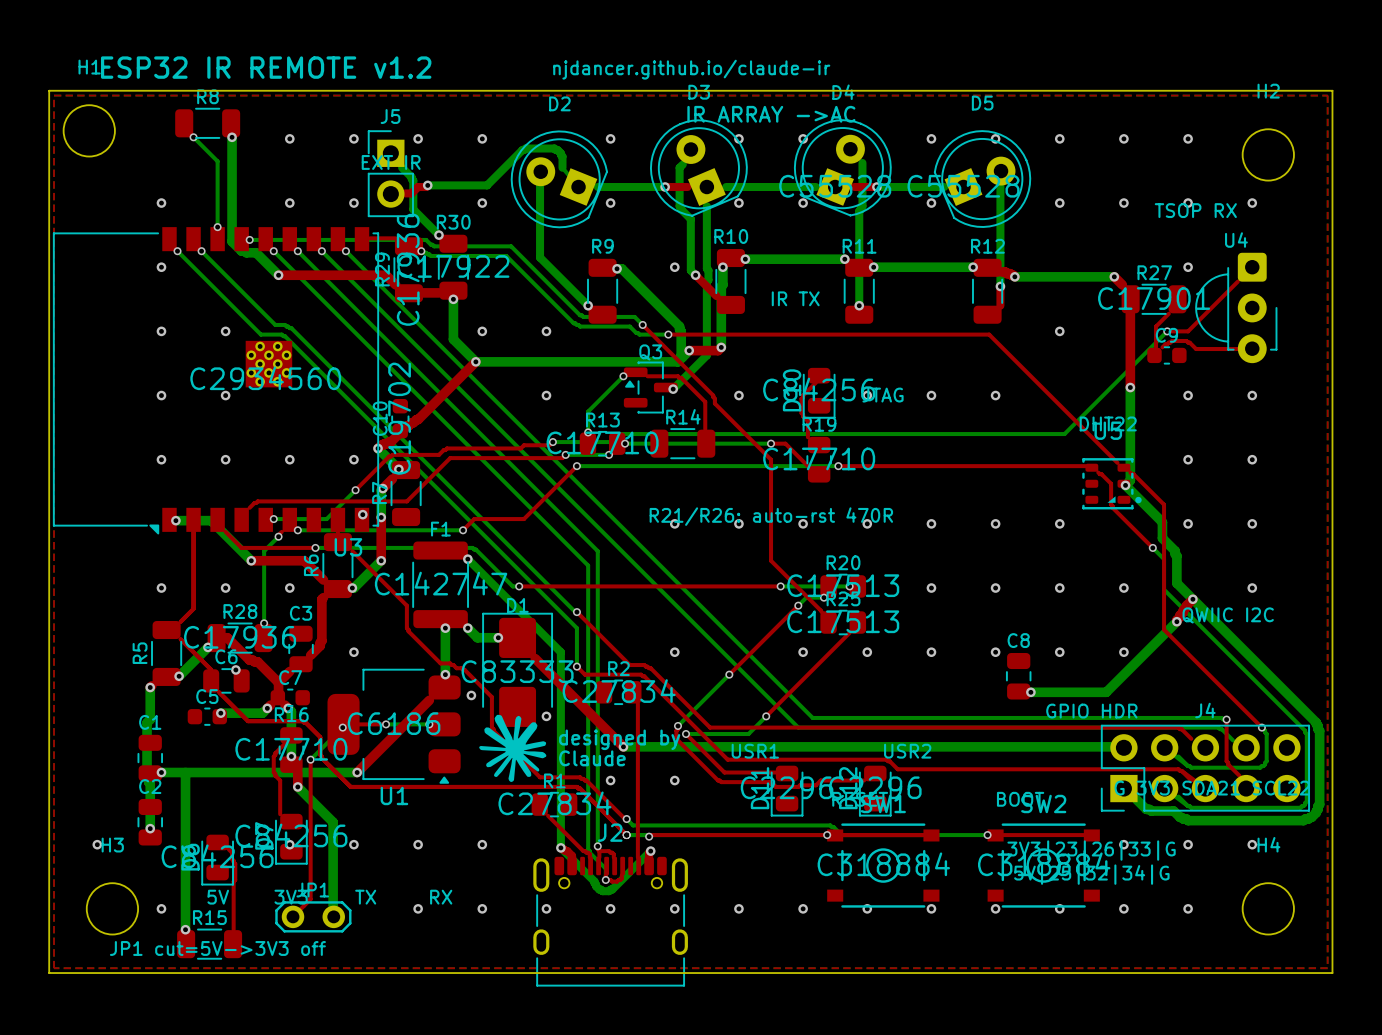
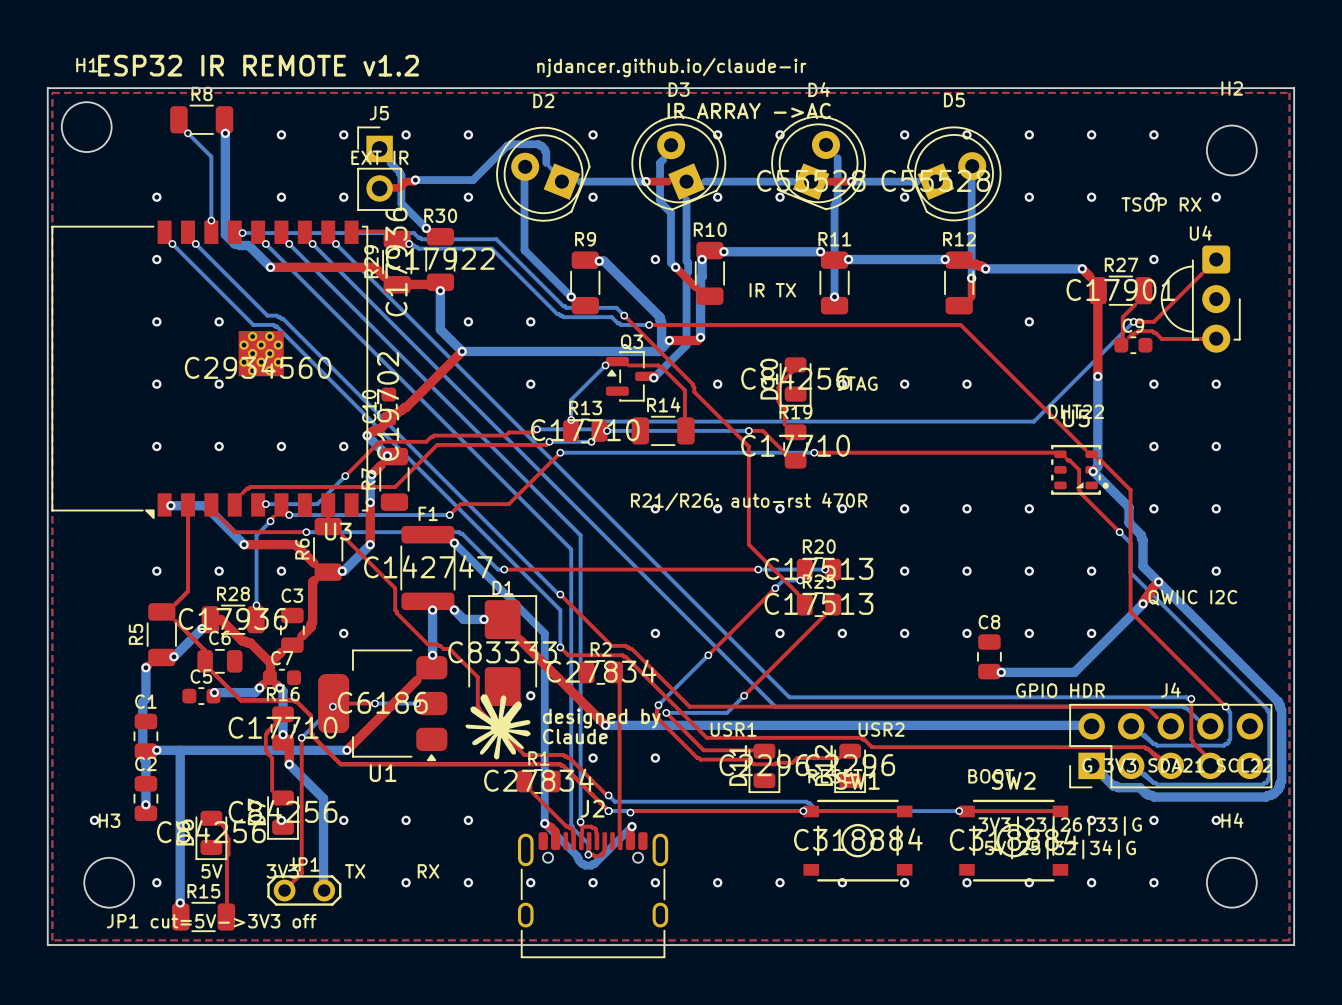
via: (362, 514) -> none
via: (235, 669) -> none
via: (471, 695) -> none

